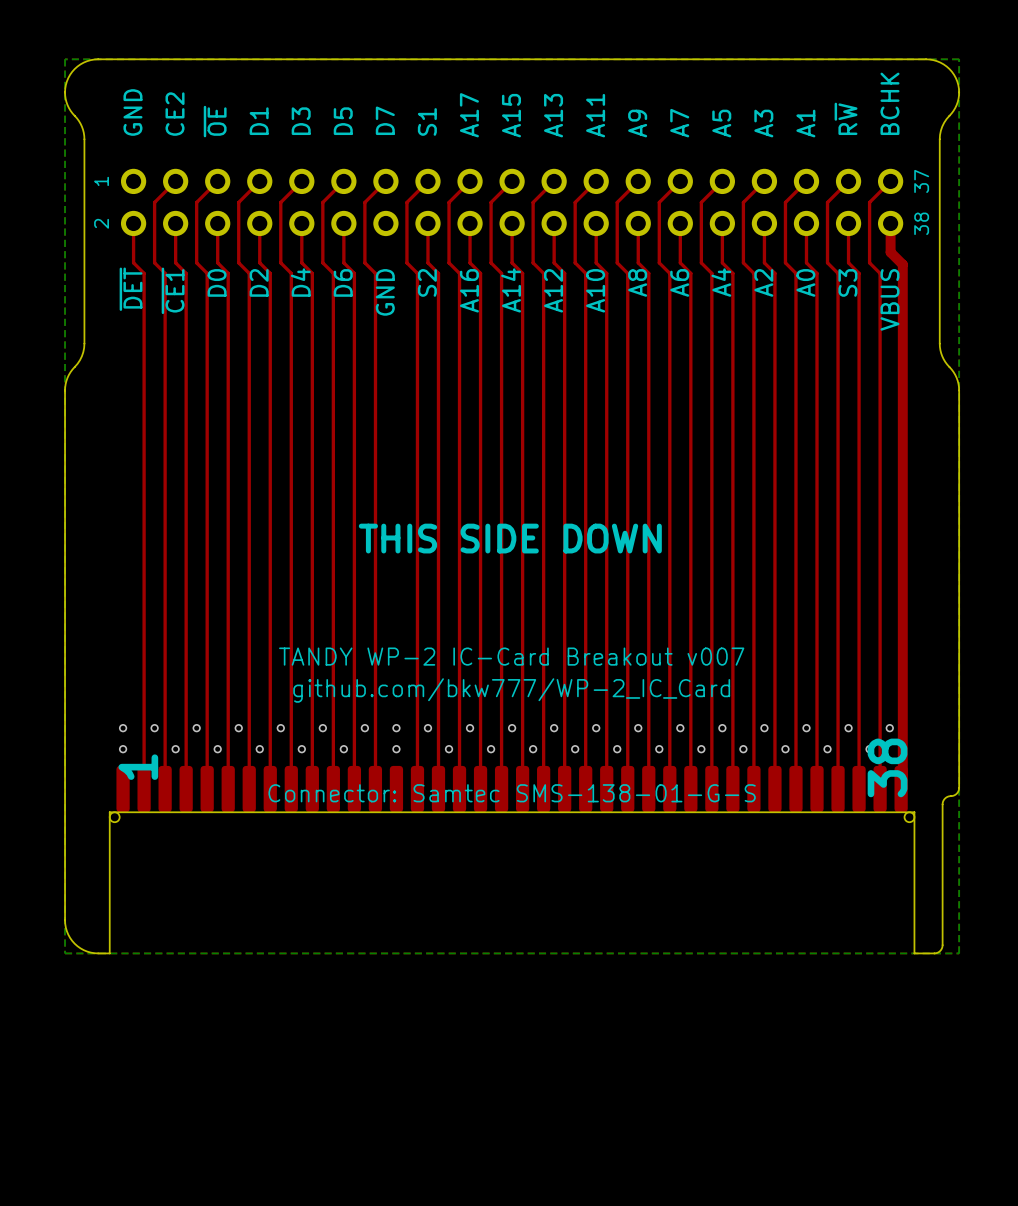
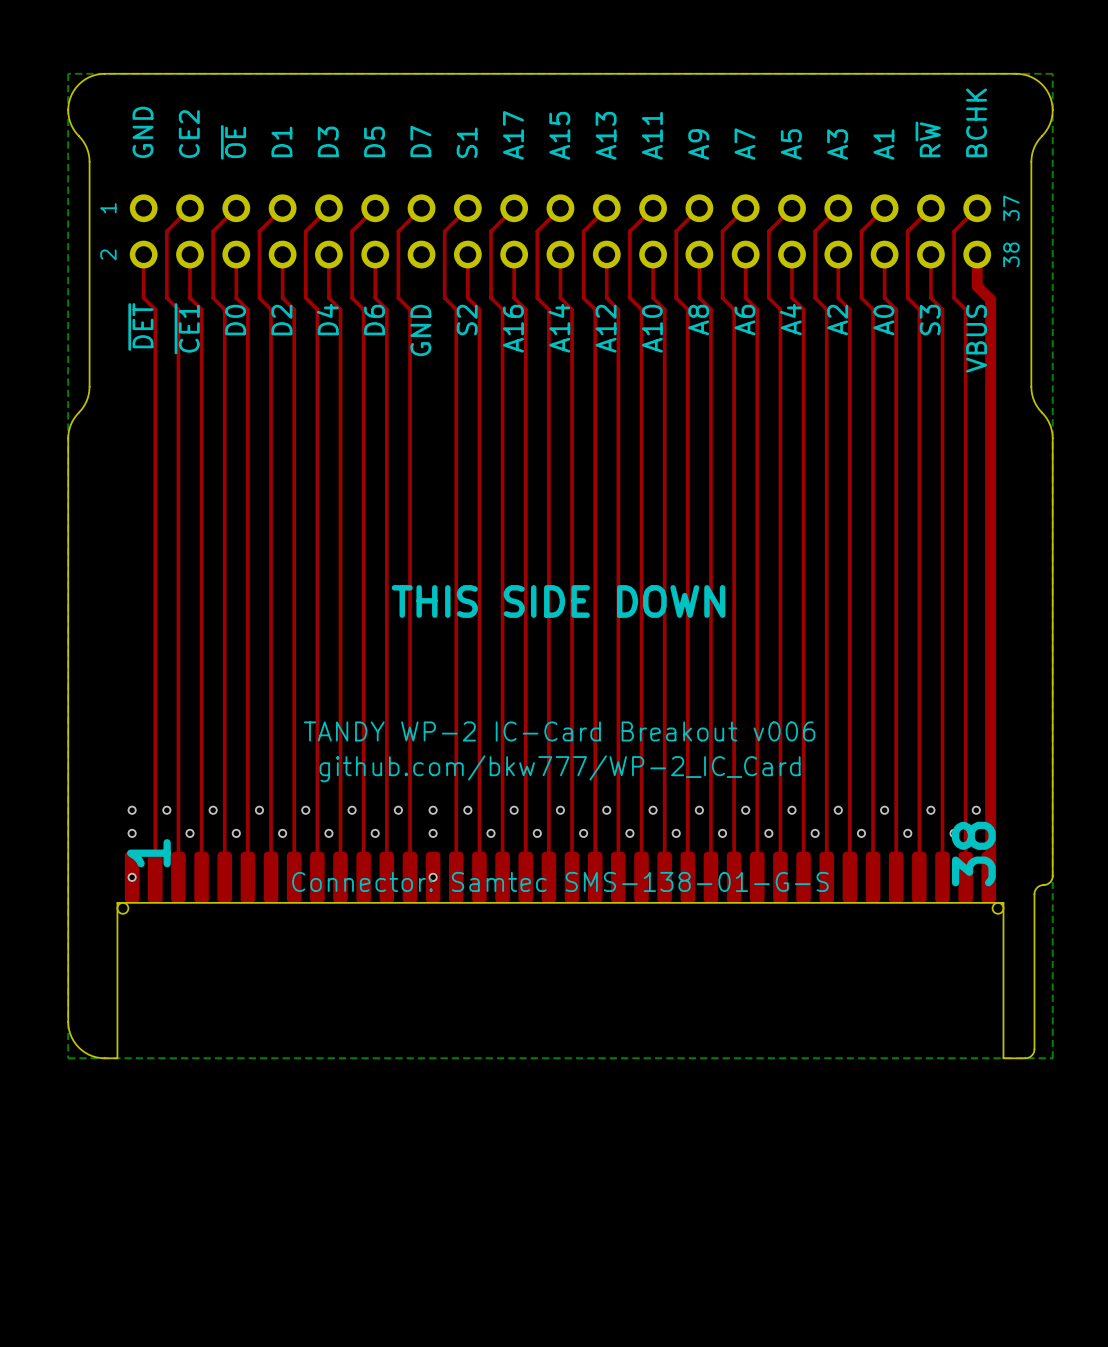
text: TANDY WP-2 IC-Card Breakout v007 (511, 656) -> TANDY WP-2 IC-Card Breakout v006 (559, 731)
via: none -> (132, 877)
via: none -> (433, 877)

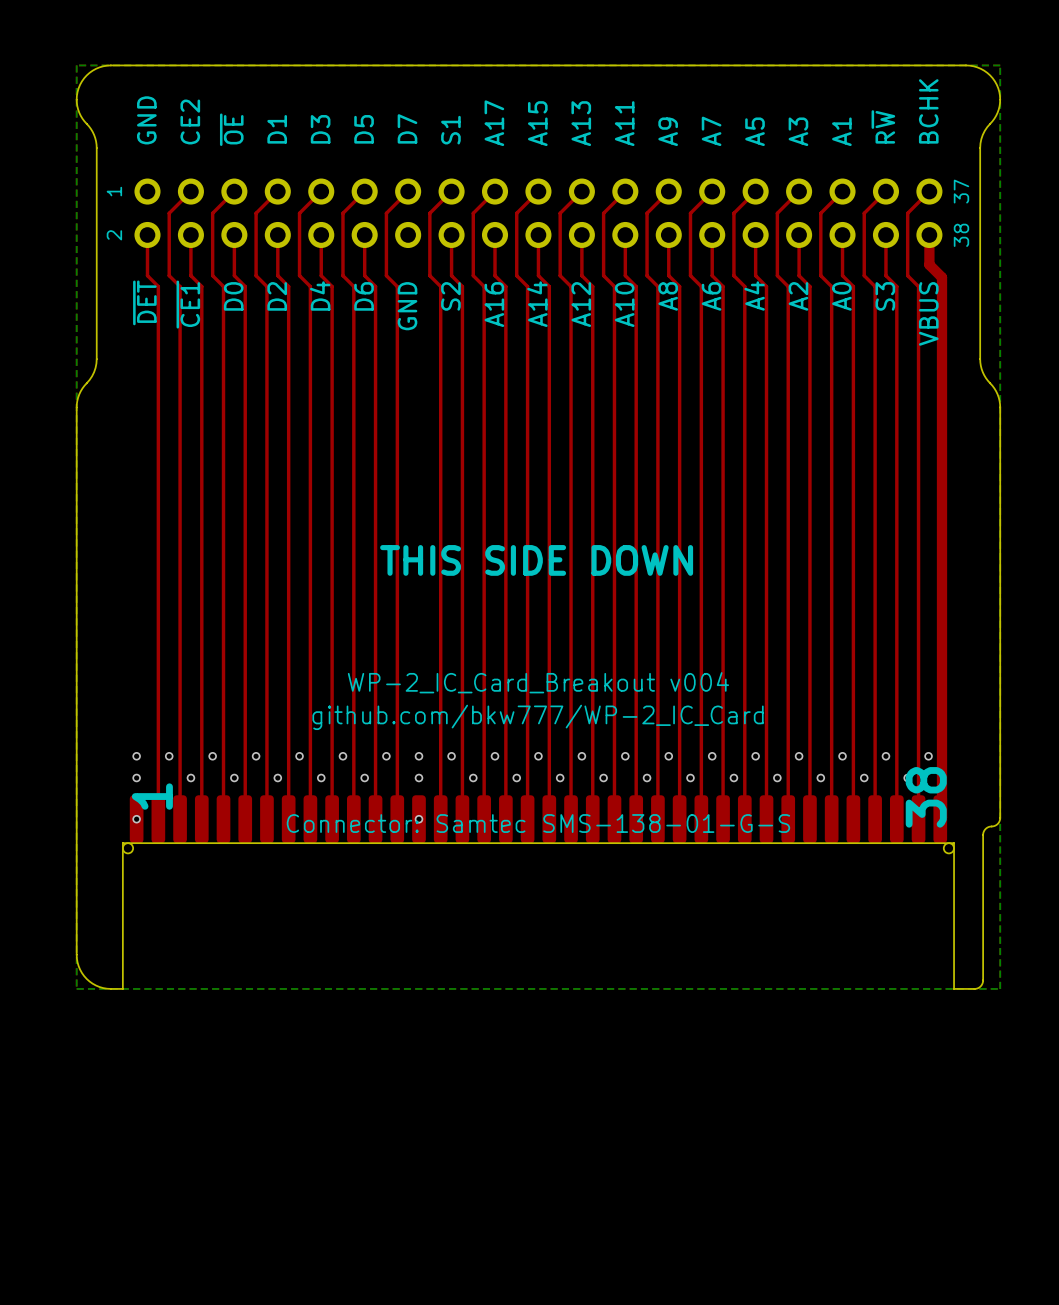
text: TANDY WP-2 IC-Card Breakout v006 (559, 731) -> WP-2_IC_Card_Breakout v004 (538, 682)

